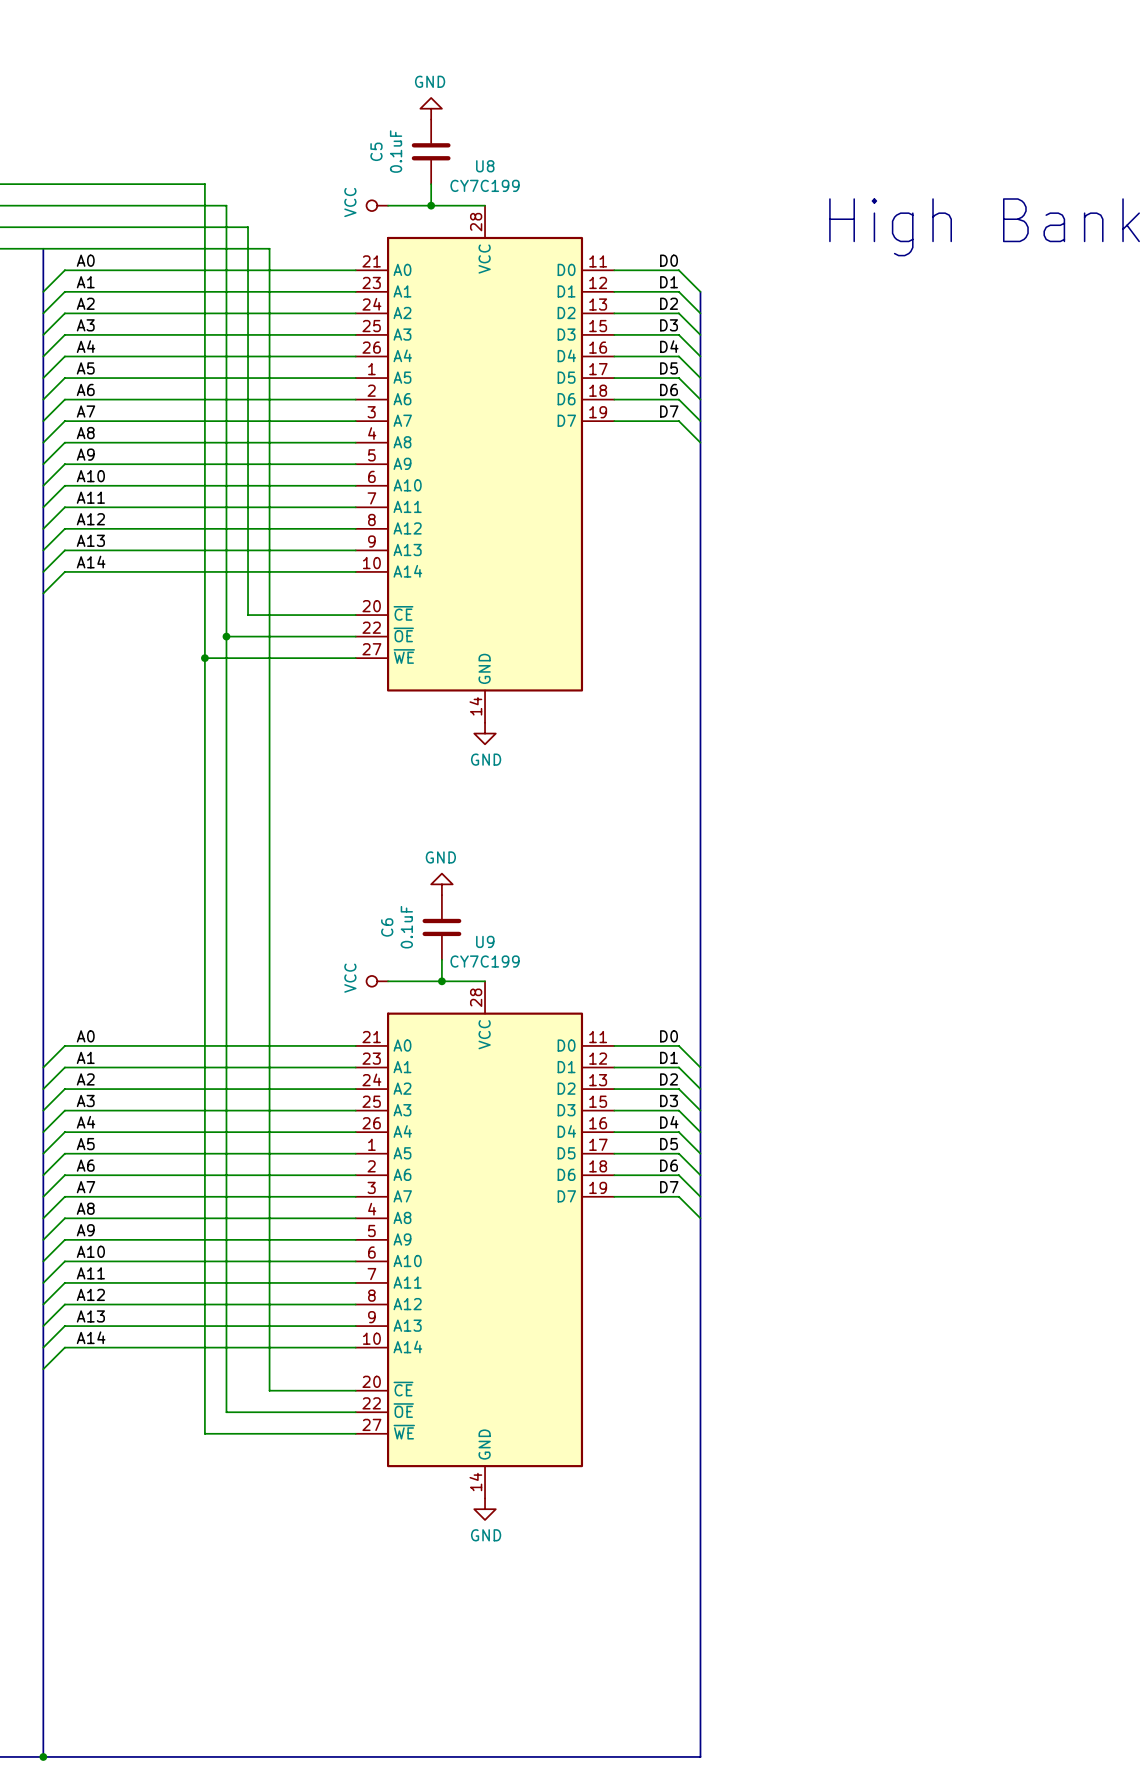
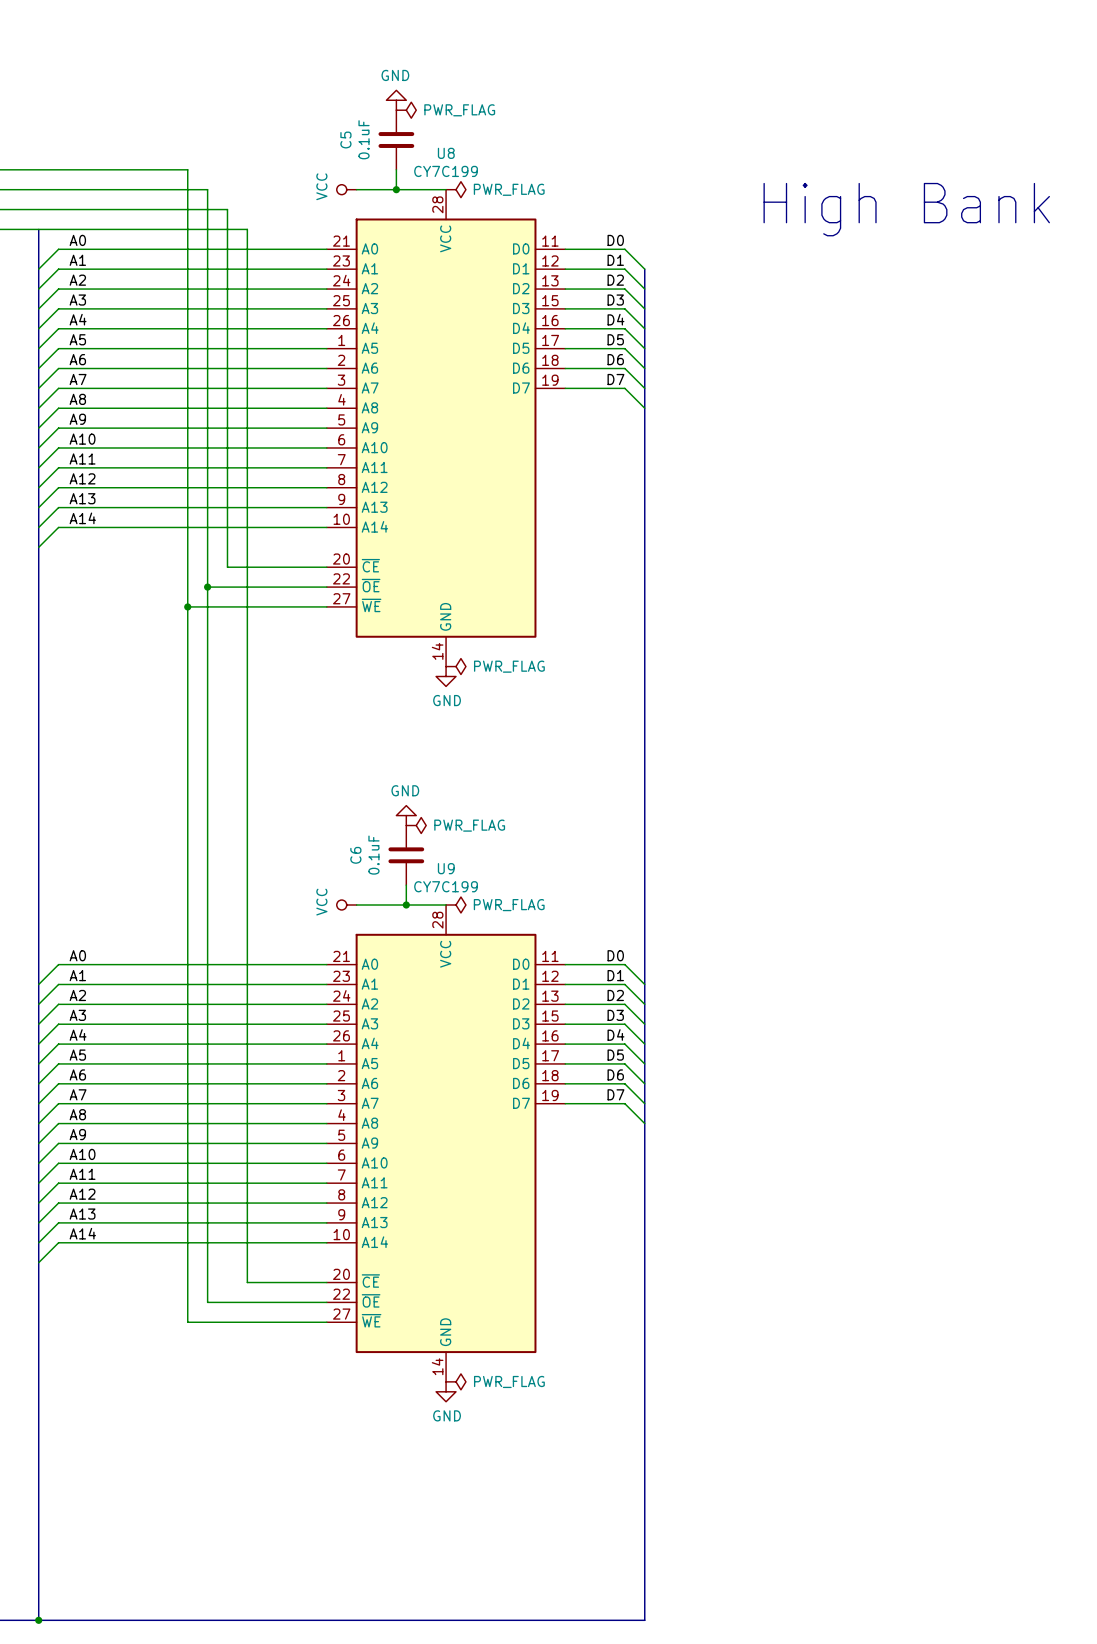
power symbol: none -> PWR_FLAG (406, 110)
power symbol: none -> PWR_FLAG (455, 189)
power symbol: none -> PWR_FLAG (455, 666)
power symbol: none -> PWR_FLAG (416, 825)
power symbol: none -> PWR_FLAG (455, 905)
power symbol: none -> PWR_FLAG (455, 1381)

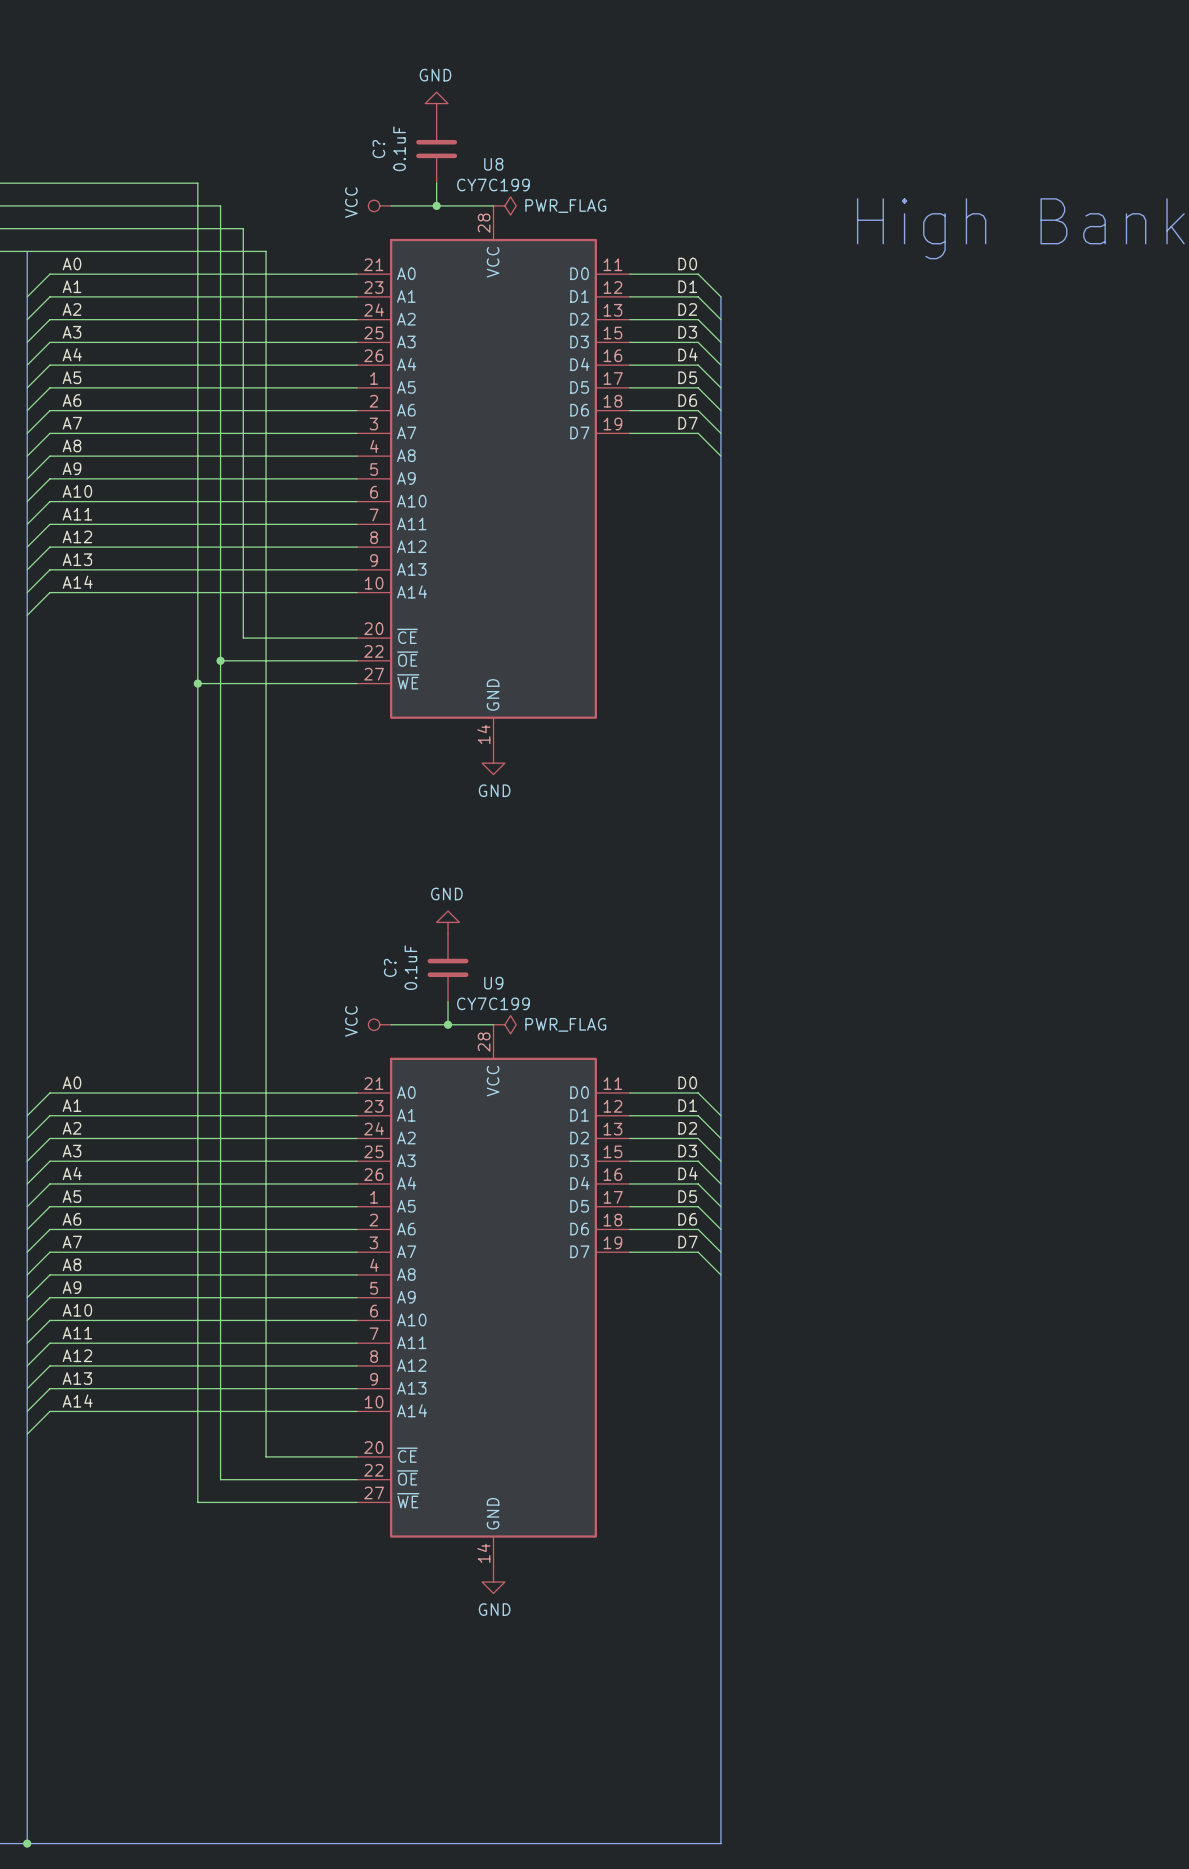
power symbol: PWR_FLAG (406, 110) -> none
C5 name: C5 (345, 140) -> C? (378, 149)
power symbol: PWR_FLAG (455, 666) -> none
power symbol: PWR_FLAG (416, 825) -> none
C6 name: C6 (355, 855) -> C? (390, 967)
power symbol: PWR_FLAG (455, 1381) -> none

